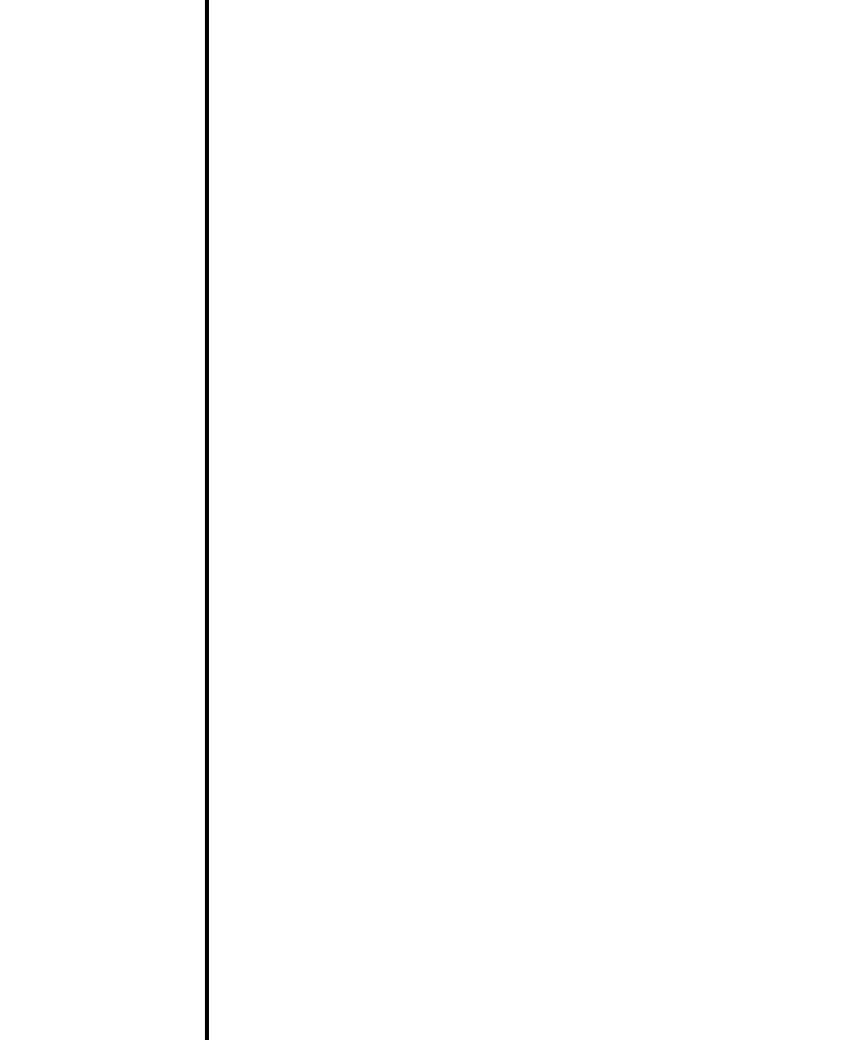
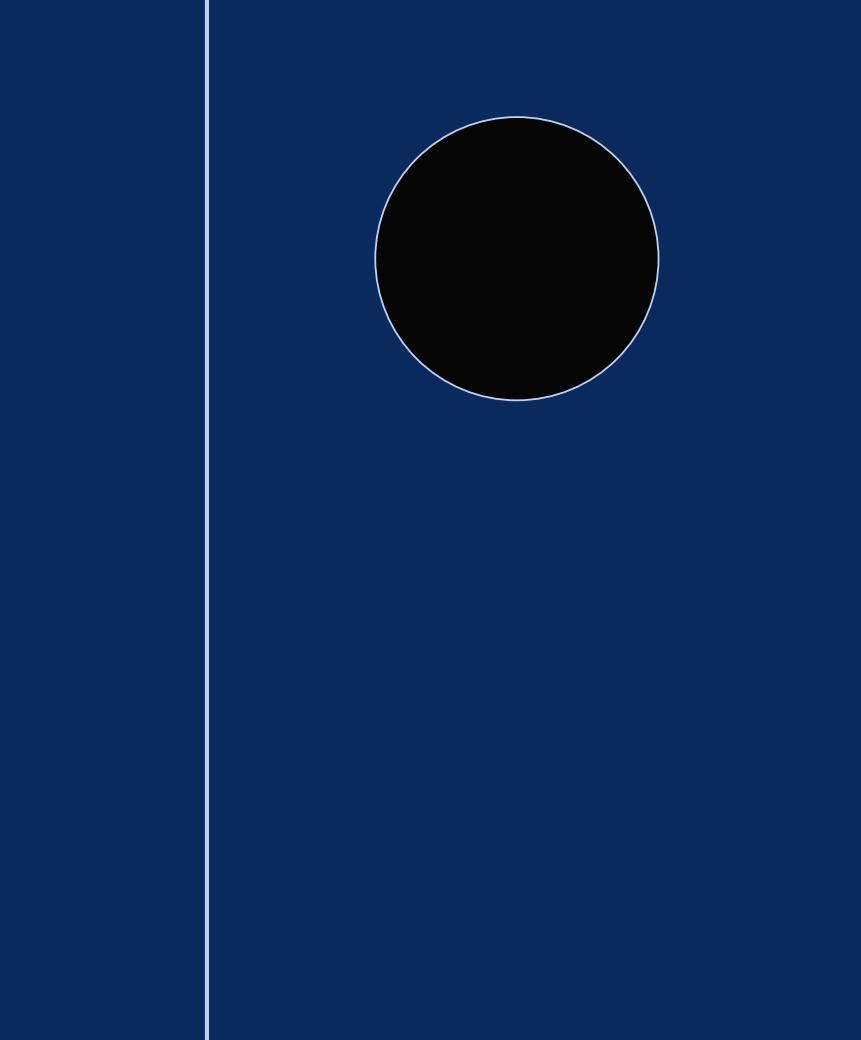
part: none -> (516, 258)

